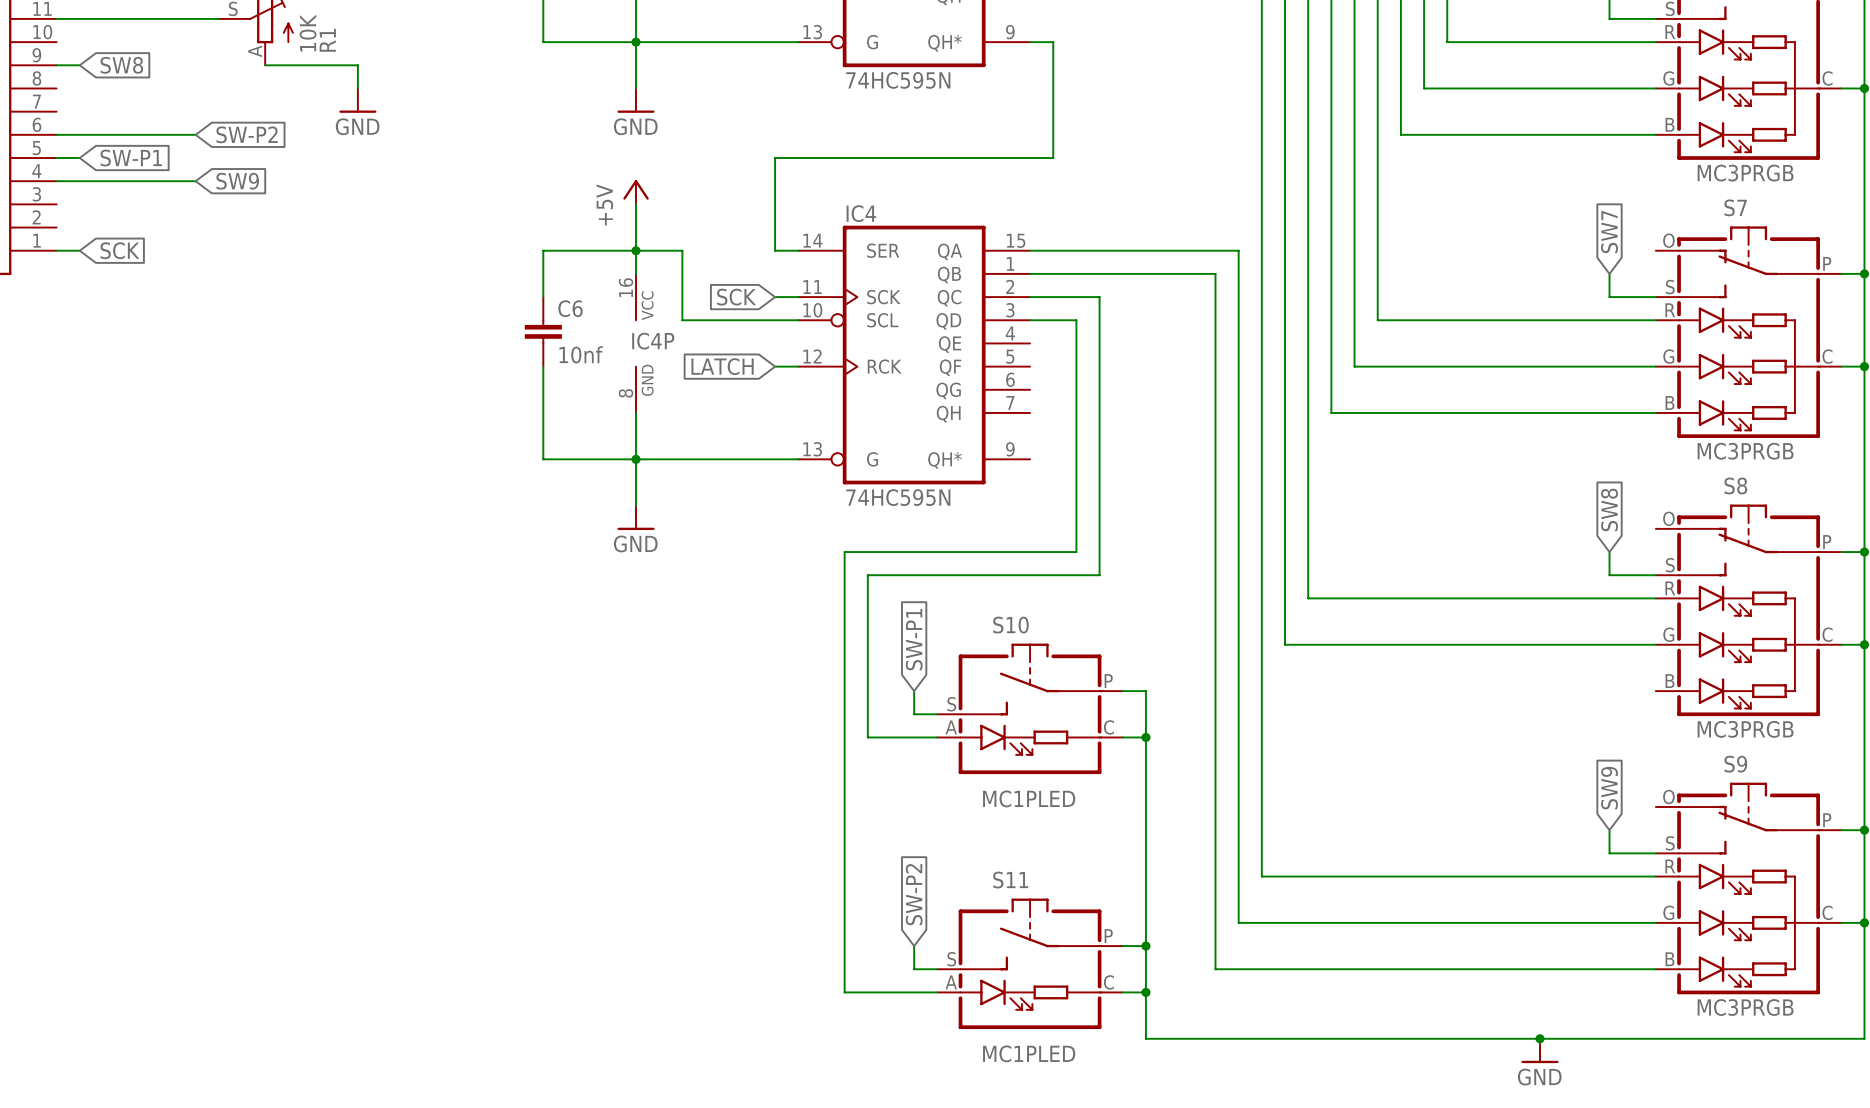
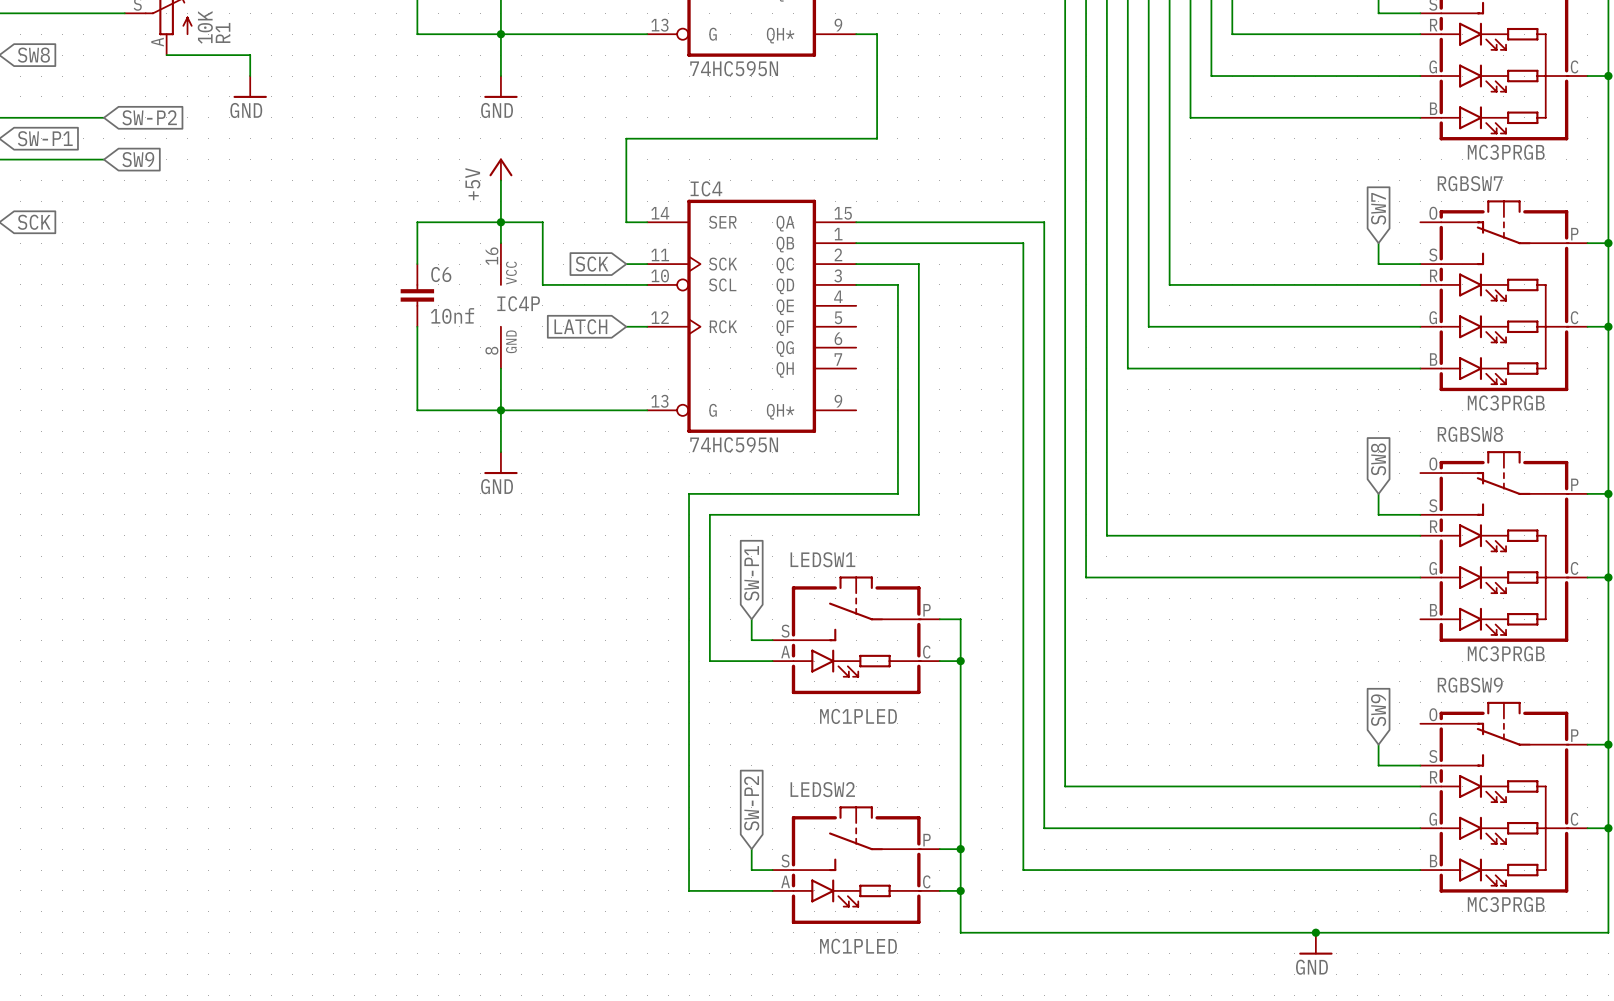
S7 name: S7 (1735, 207) -> RGBSW7 (1470, 183)
S8 name: S8 (1735, 486) -> RGBSW8 (1470, 434)
S10 name: S10 (1010, 625) -> LEDSW1 (822, 559)
S9 name: S9 (1735, 764) -> RGBSW9 (1470, 685)
S11 name: S11 (1010, 880) -> LEDSW2 (822, 789)

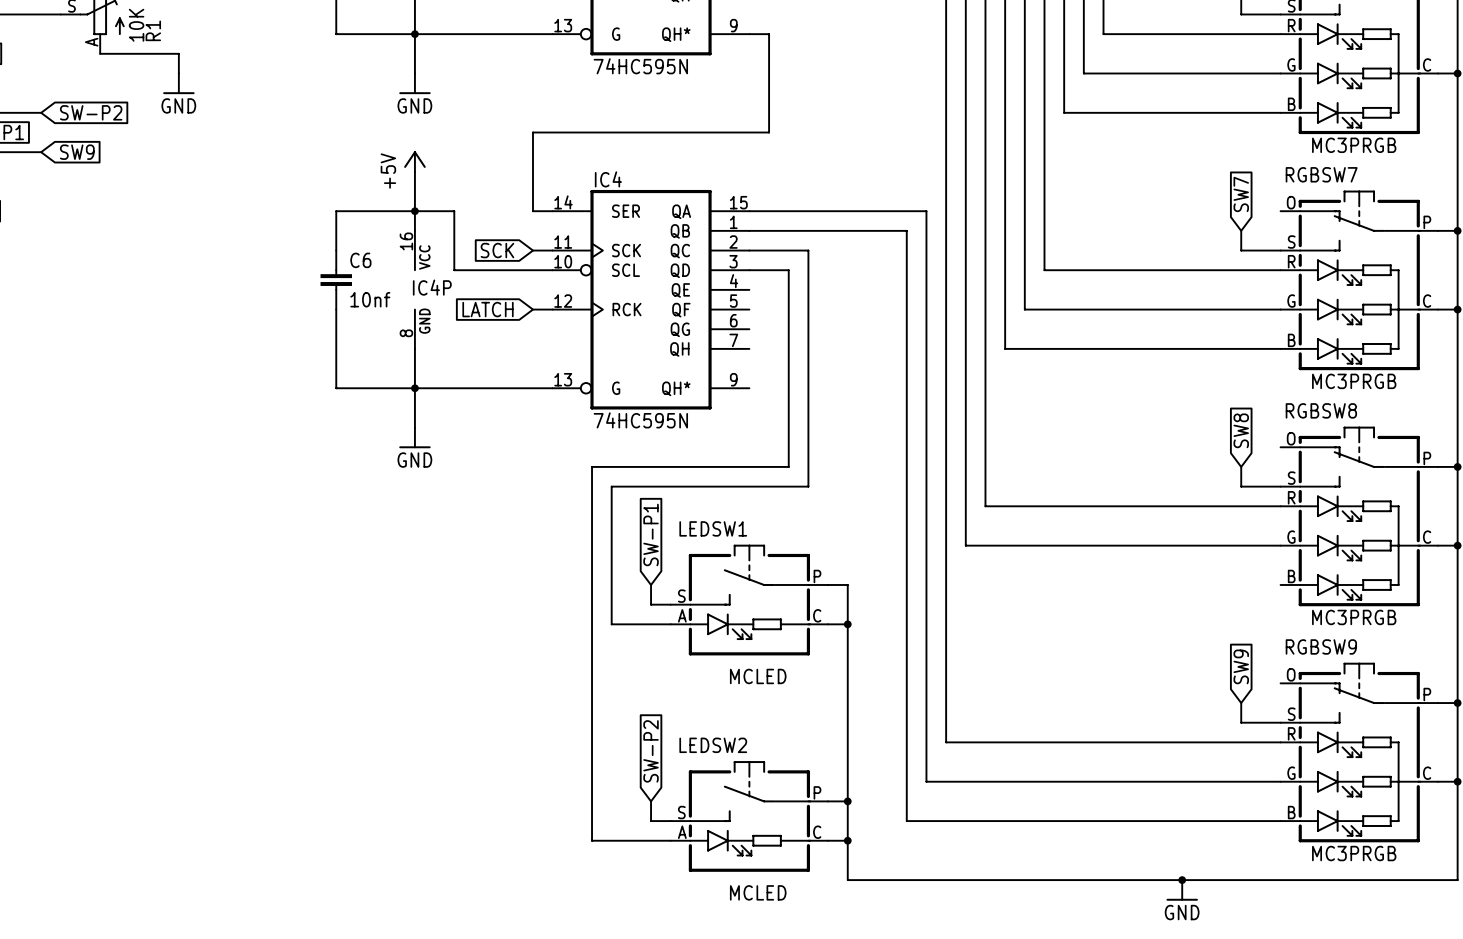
LEDSW1 value: MC1PLED (858, 716) -> MCLED (758, 676)
LEDSW2 value: MC1PLED (858, 946) -> MCLED (758, 892)

